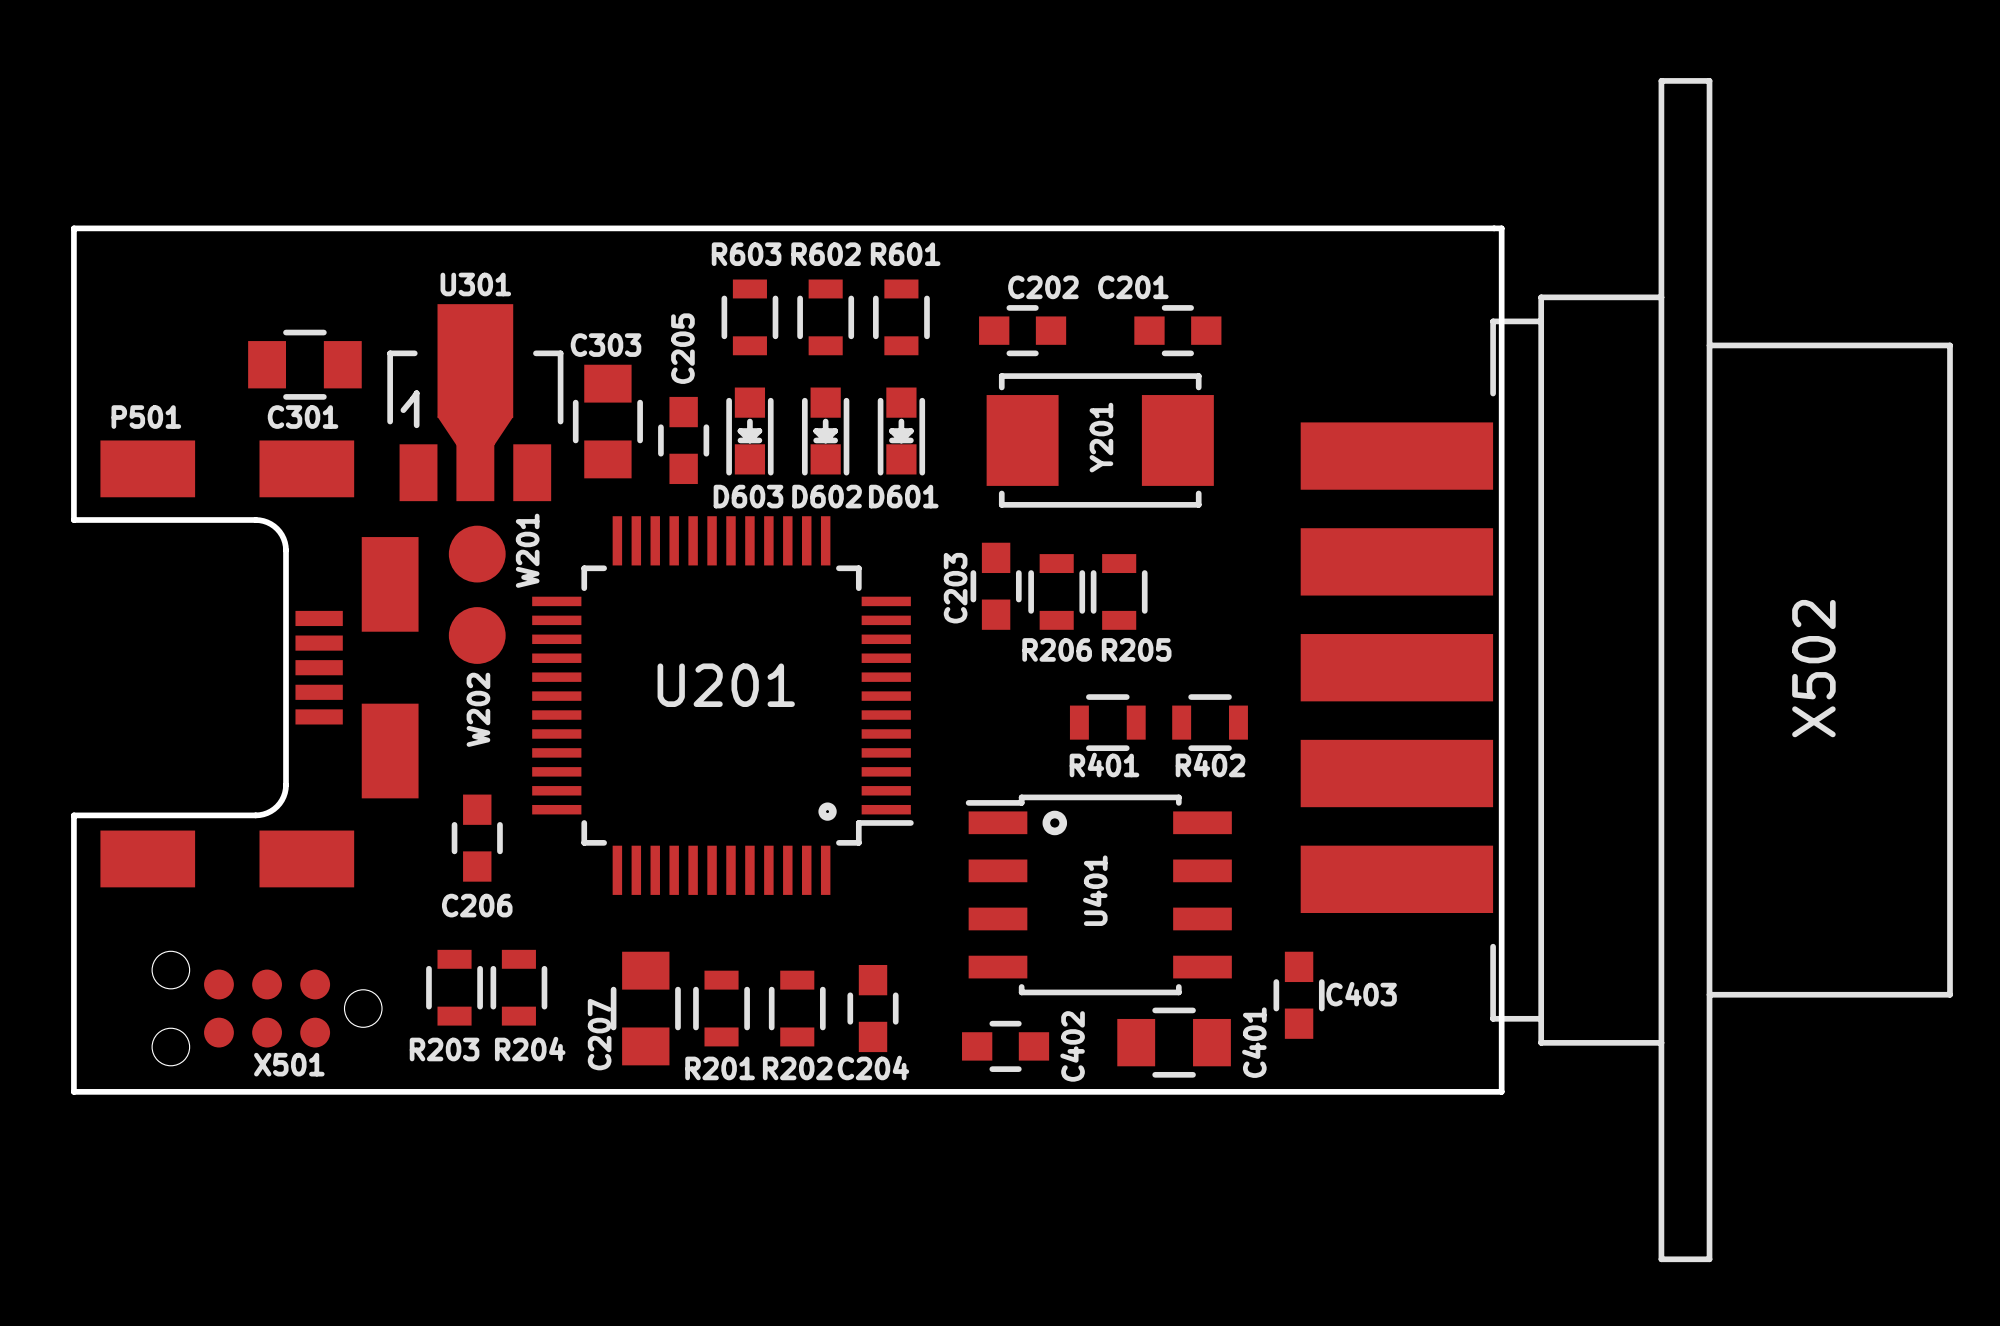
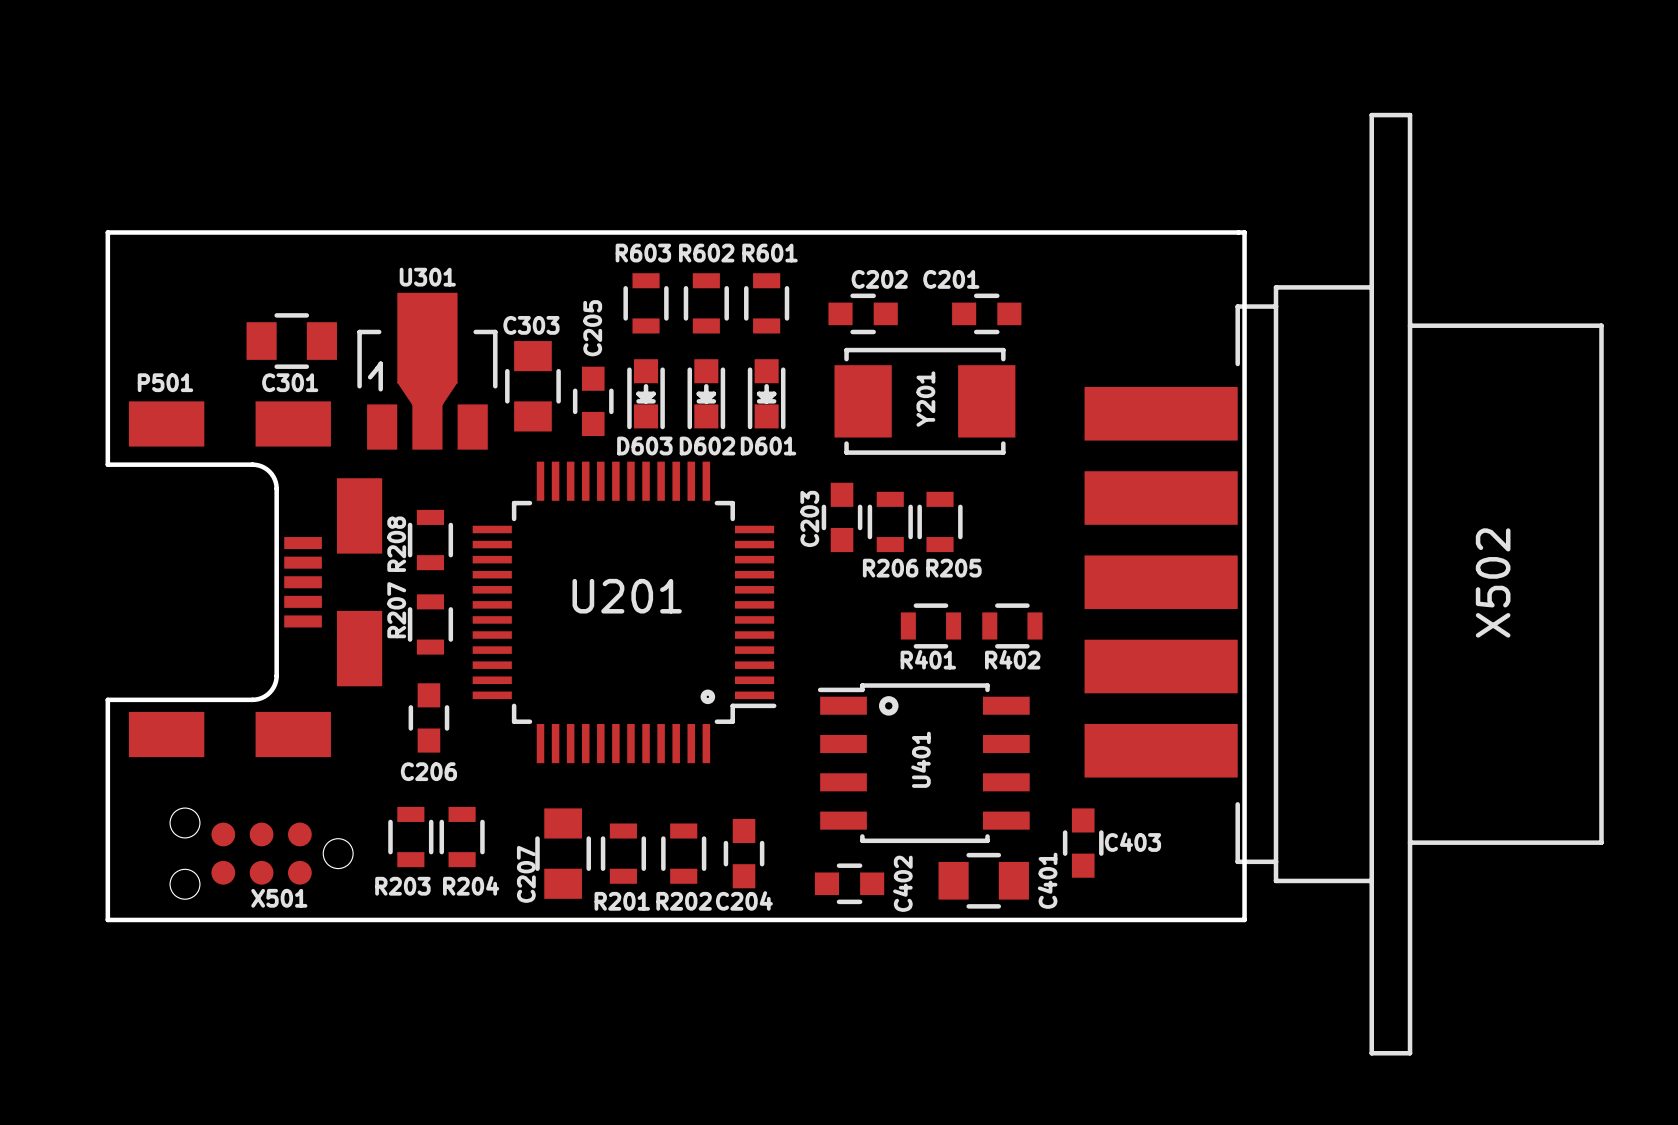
W201: (477, 554) -> none
R208: none -> (430, 540)
W202: (477, 635) -> none
R207: none -> (430, 624)

